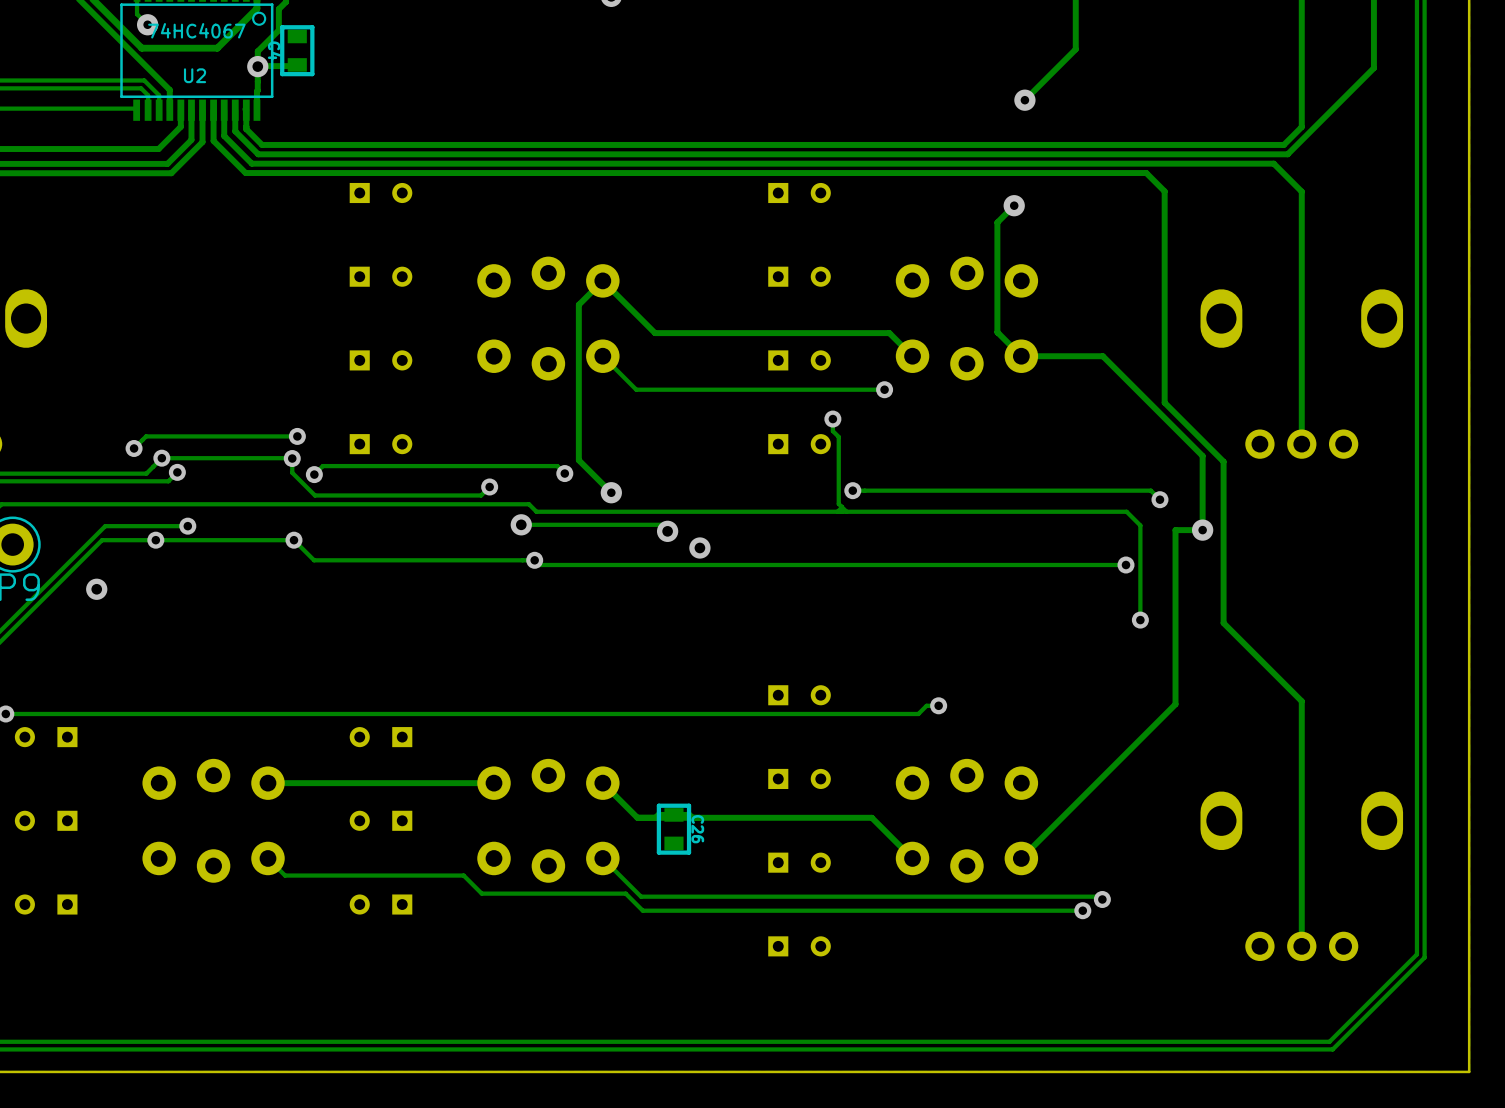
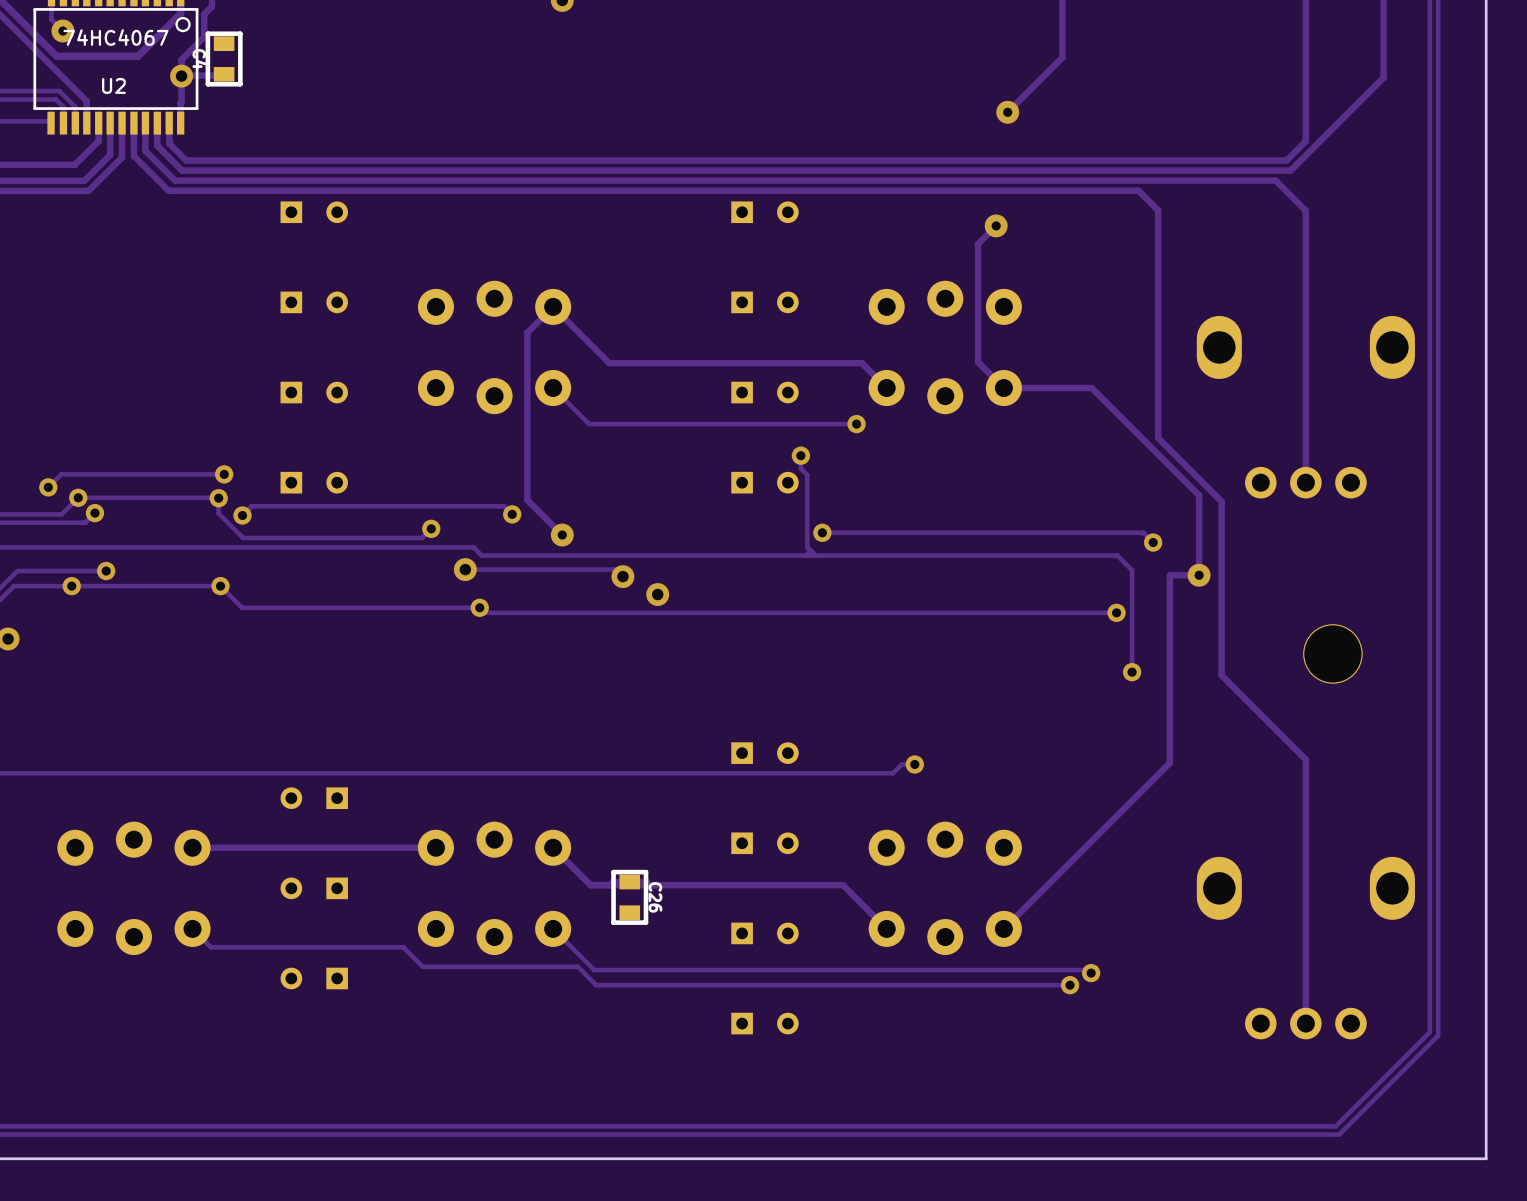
part: none -> (1332, 653)

